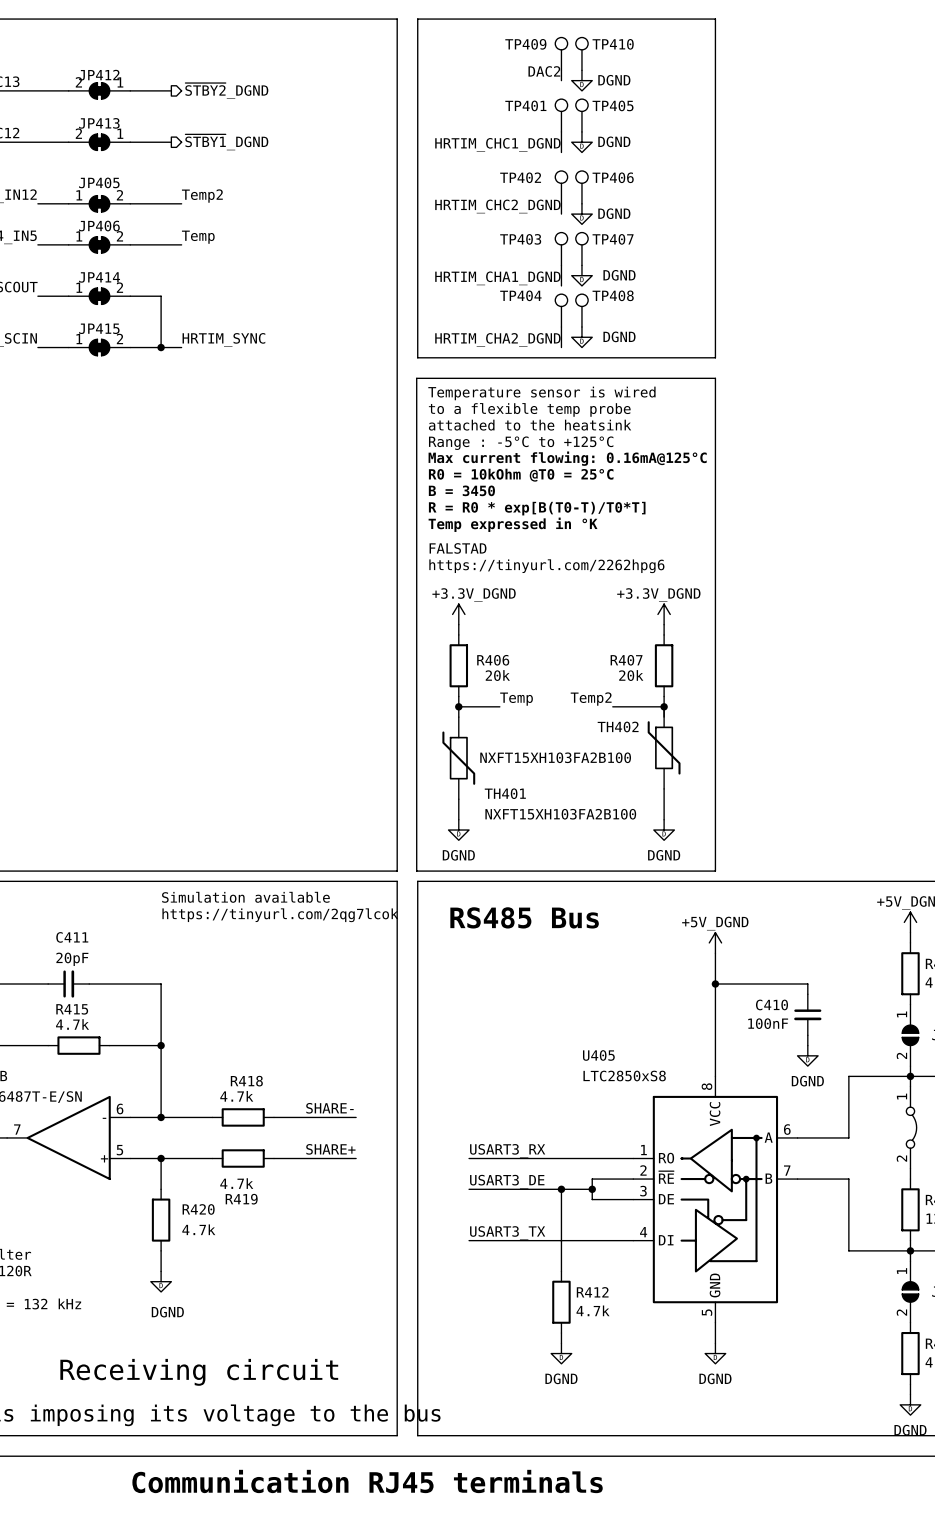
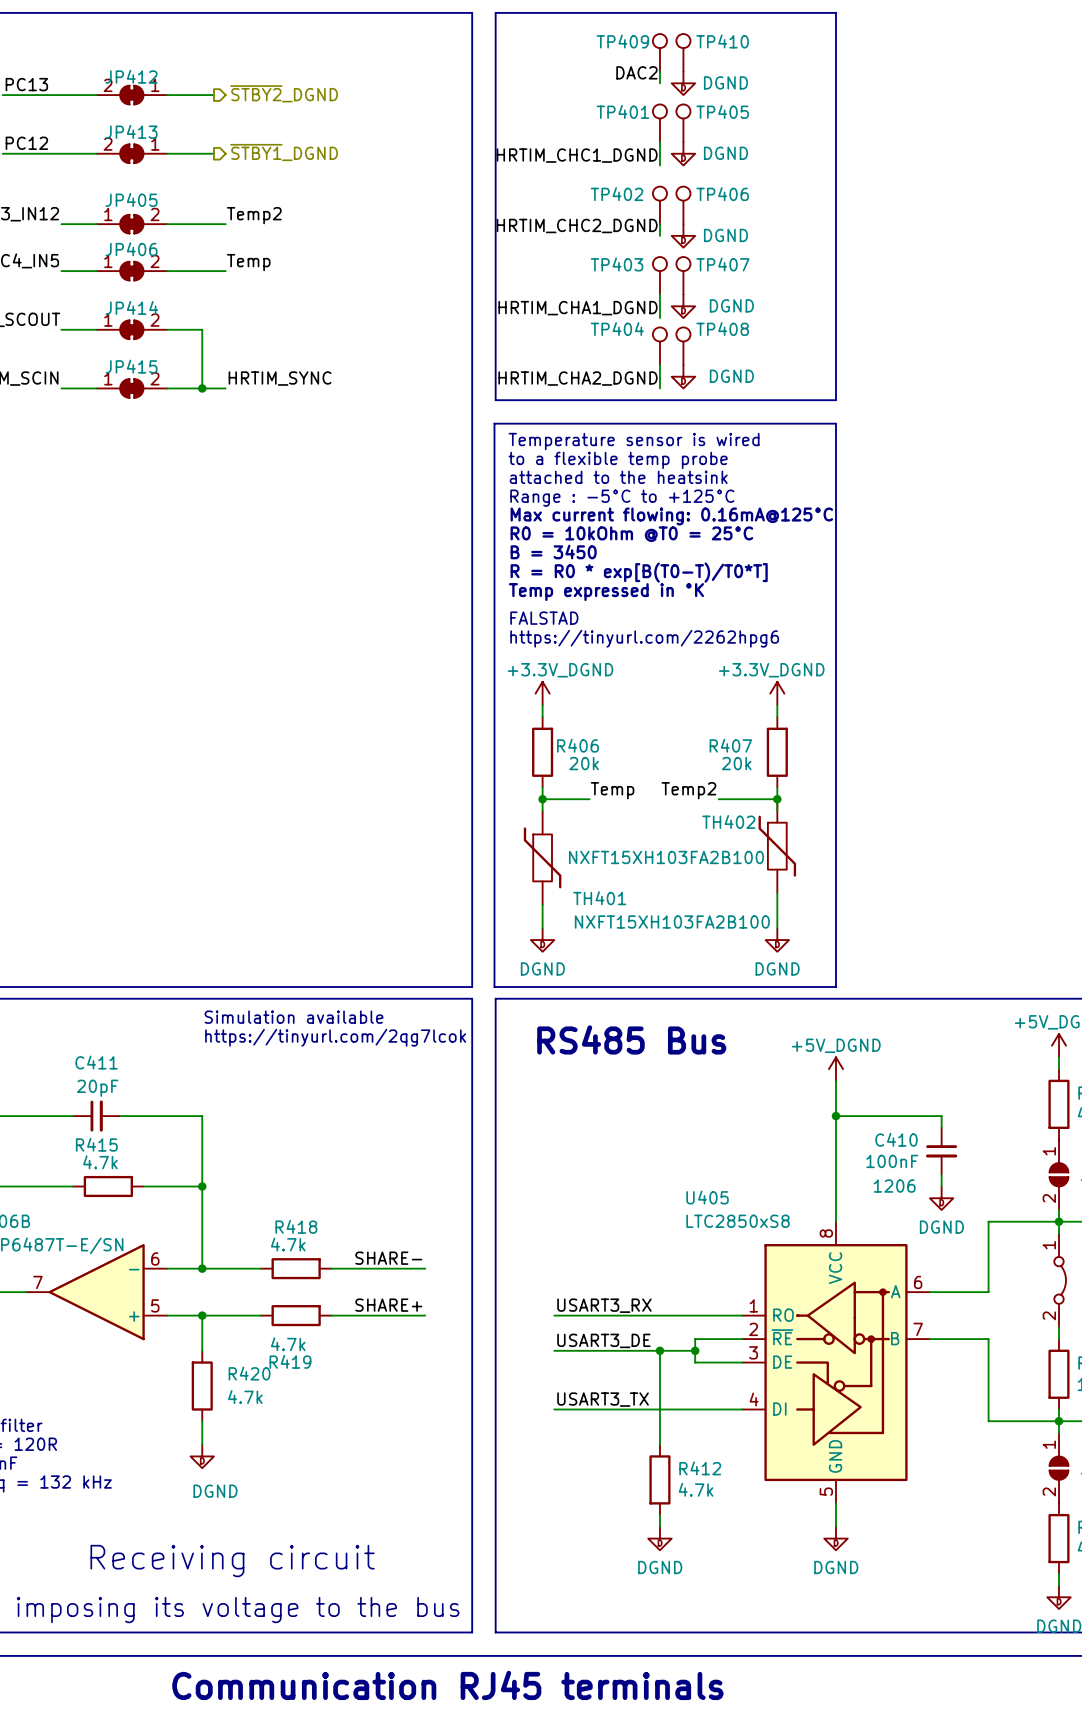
C410 text: none -> 1206 (894, 1186)

